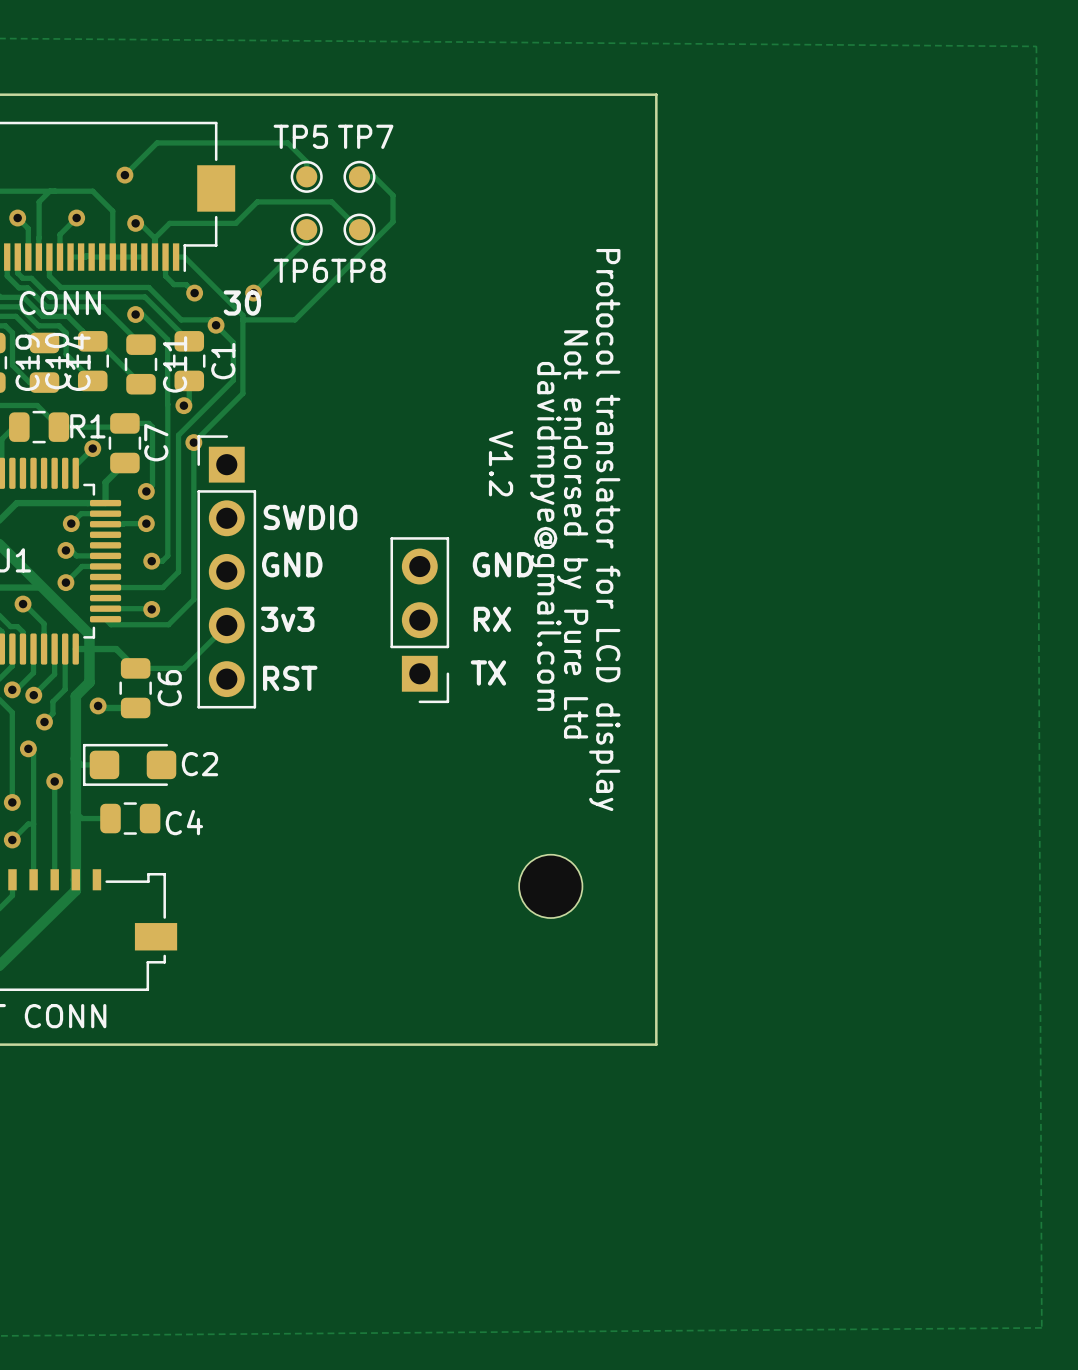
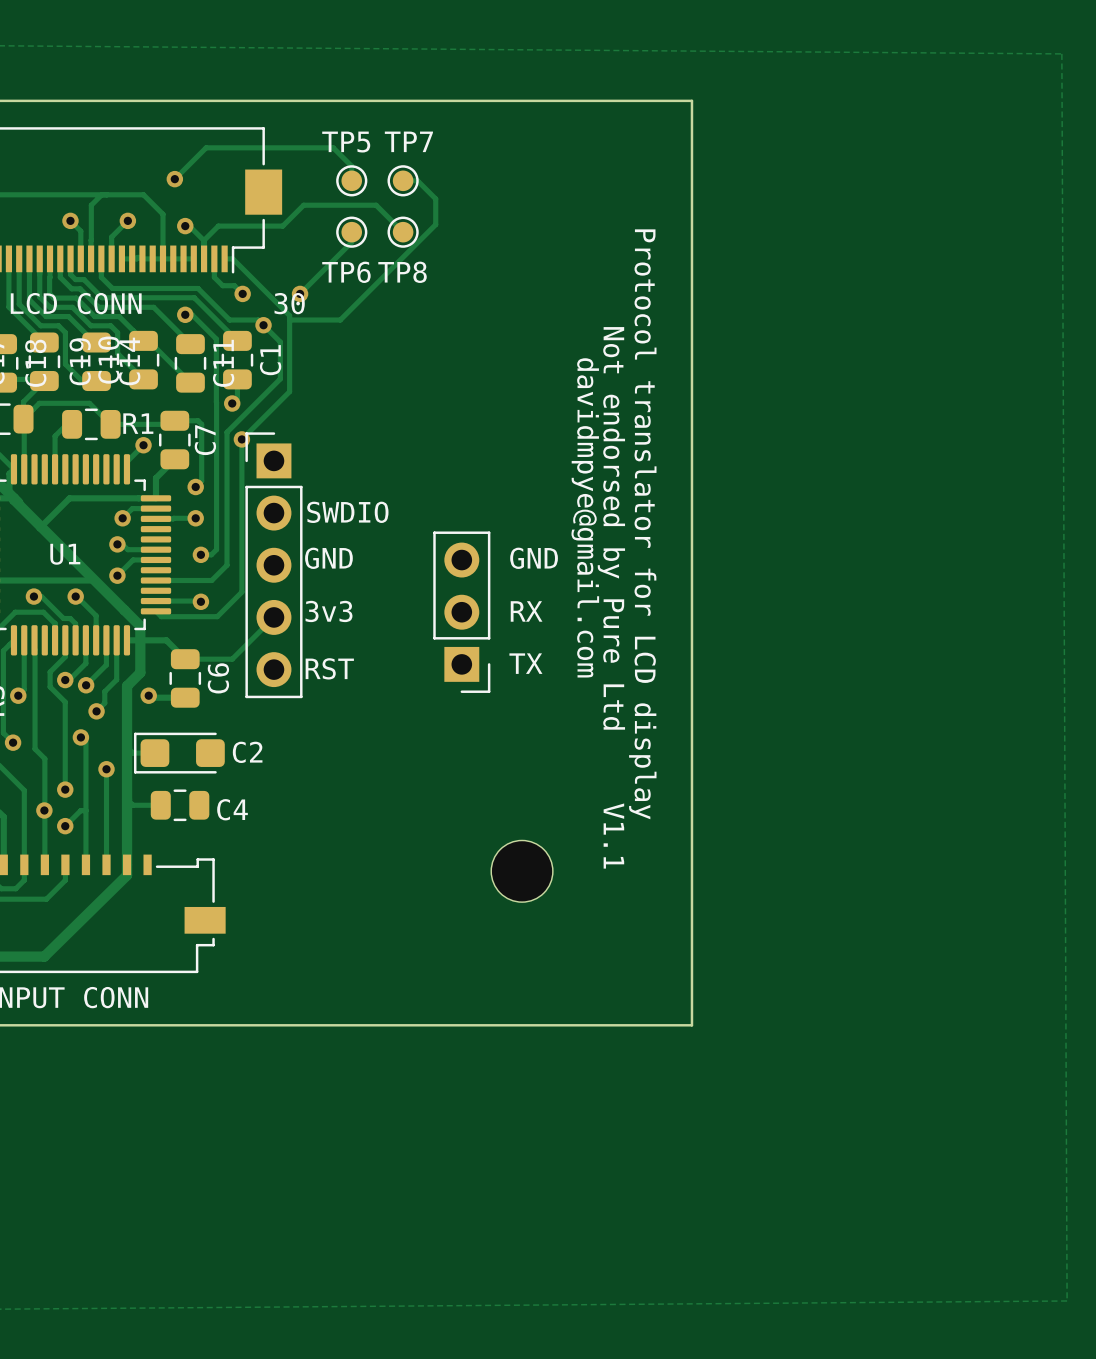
text: V1.2 (501, 463) -> none
text: none -> V1.1 (613, 836)
part position: (550, 886) -> (522, 871)

